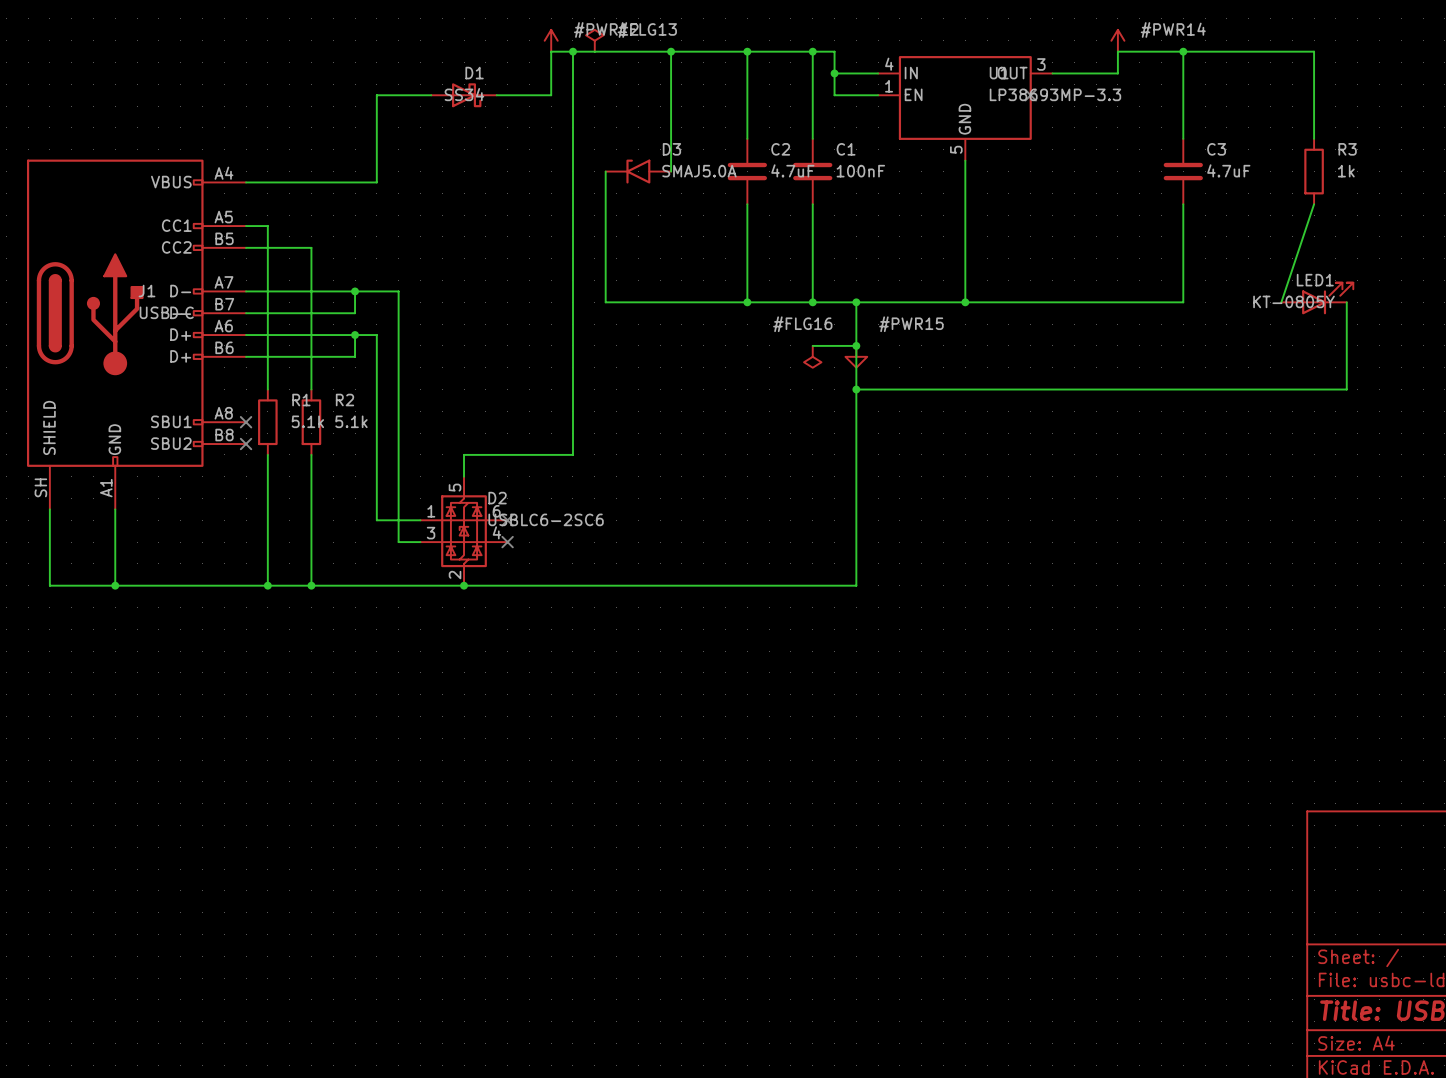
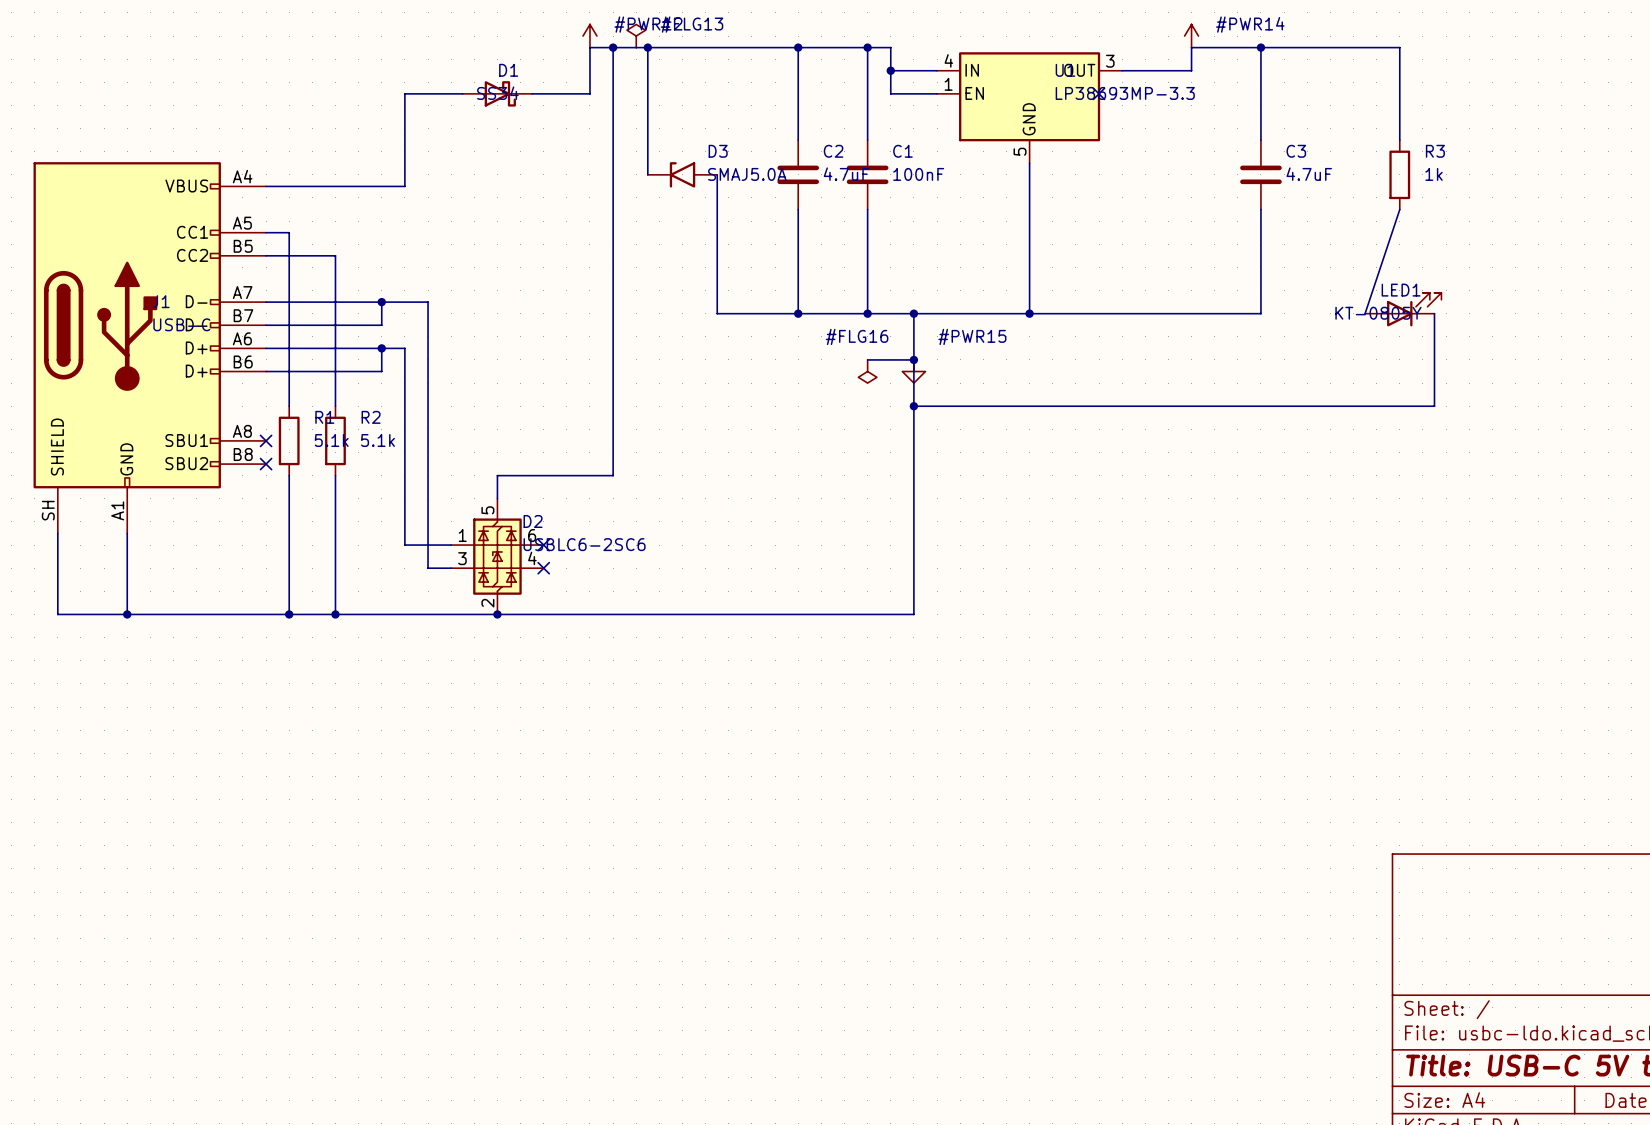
junction: none -> (647, 47)
wire: (671, 51) (671, 171) -> (647, 47) (647, 174)
junction: (671, 51) -> none
wire: (605, 171) (605, 302) (671, 302) -> (717, 174) (717, 313)

